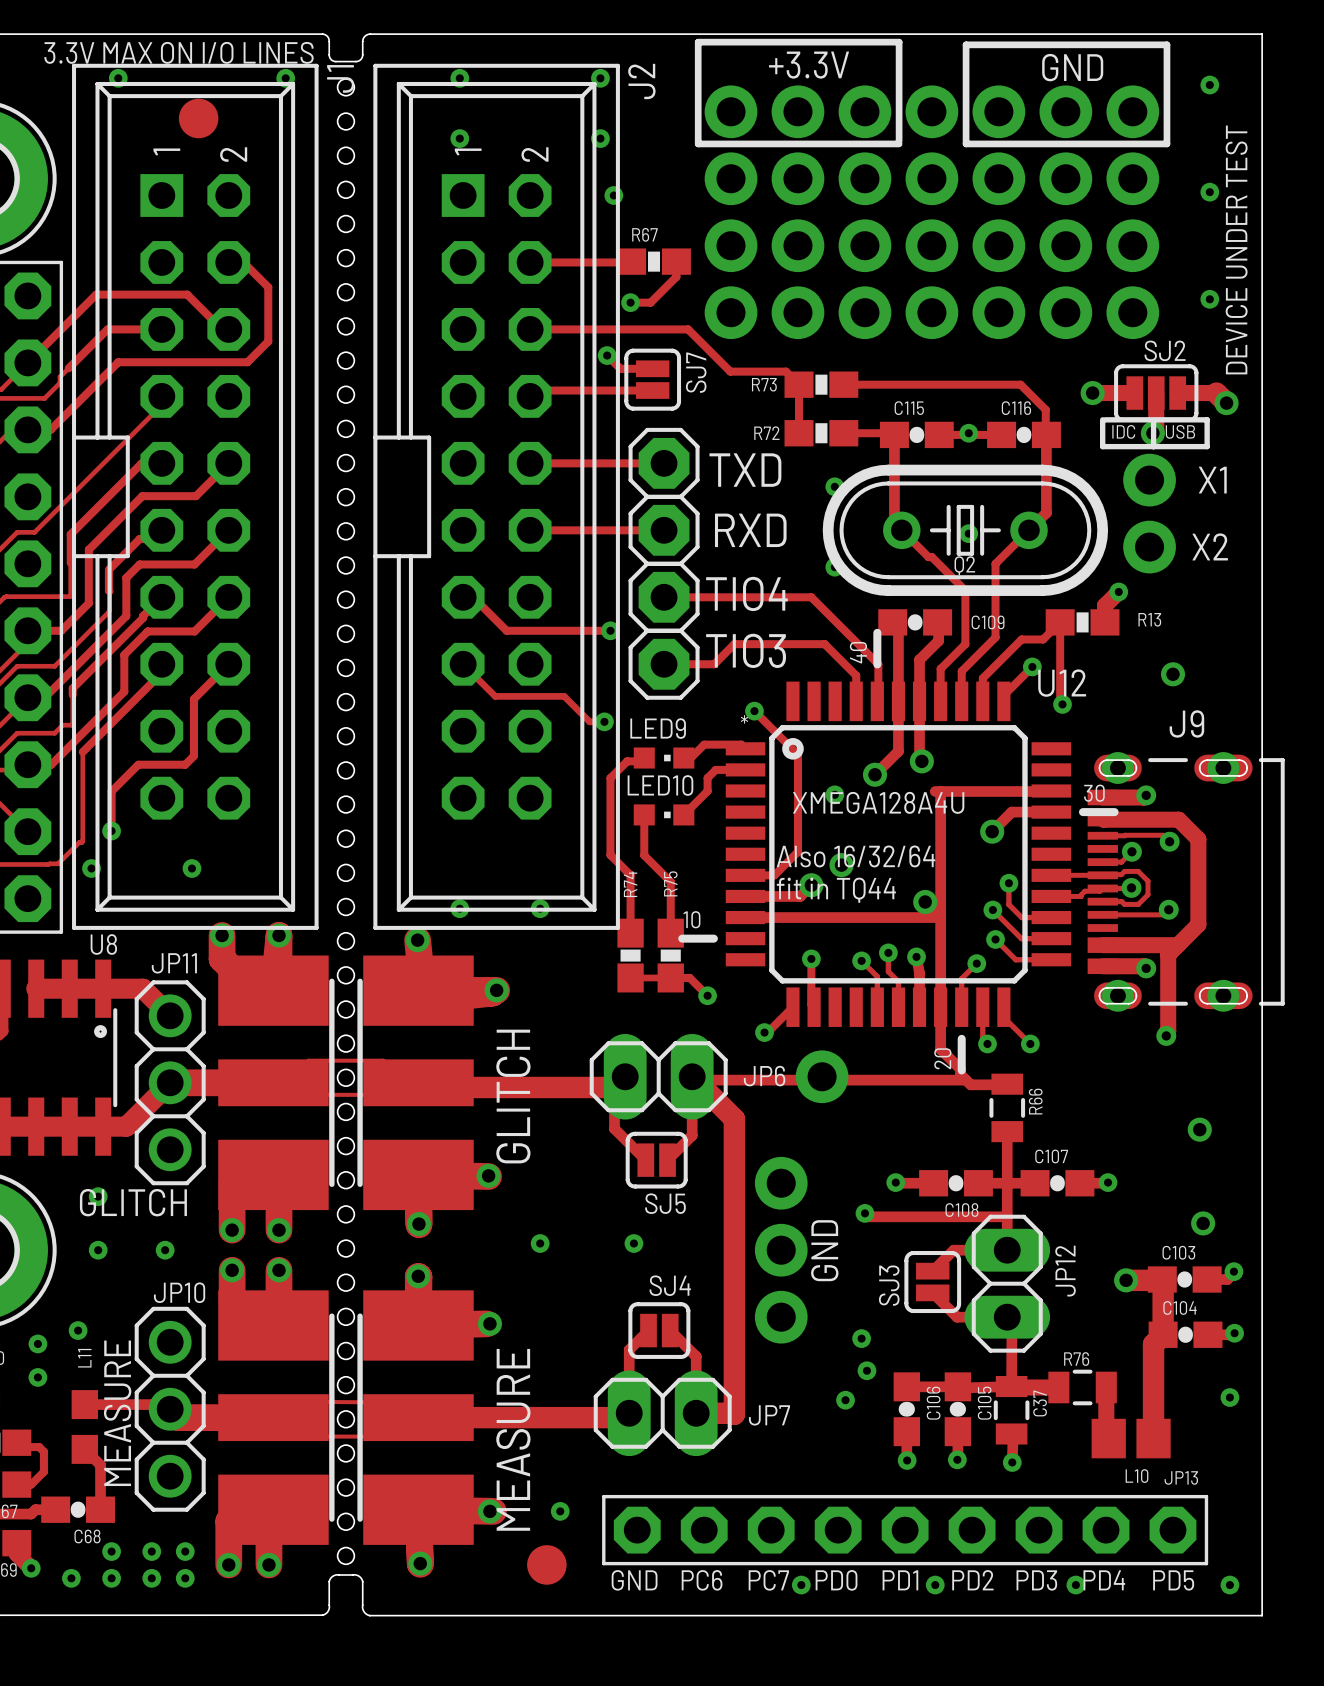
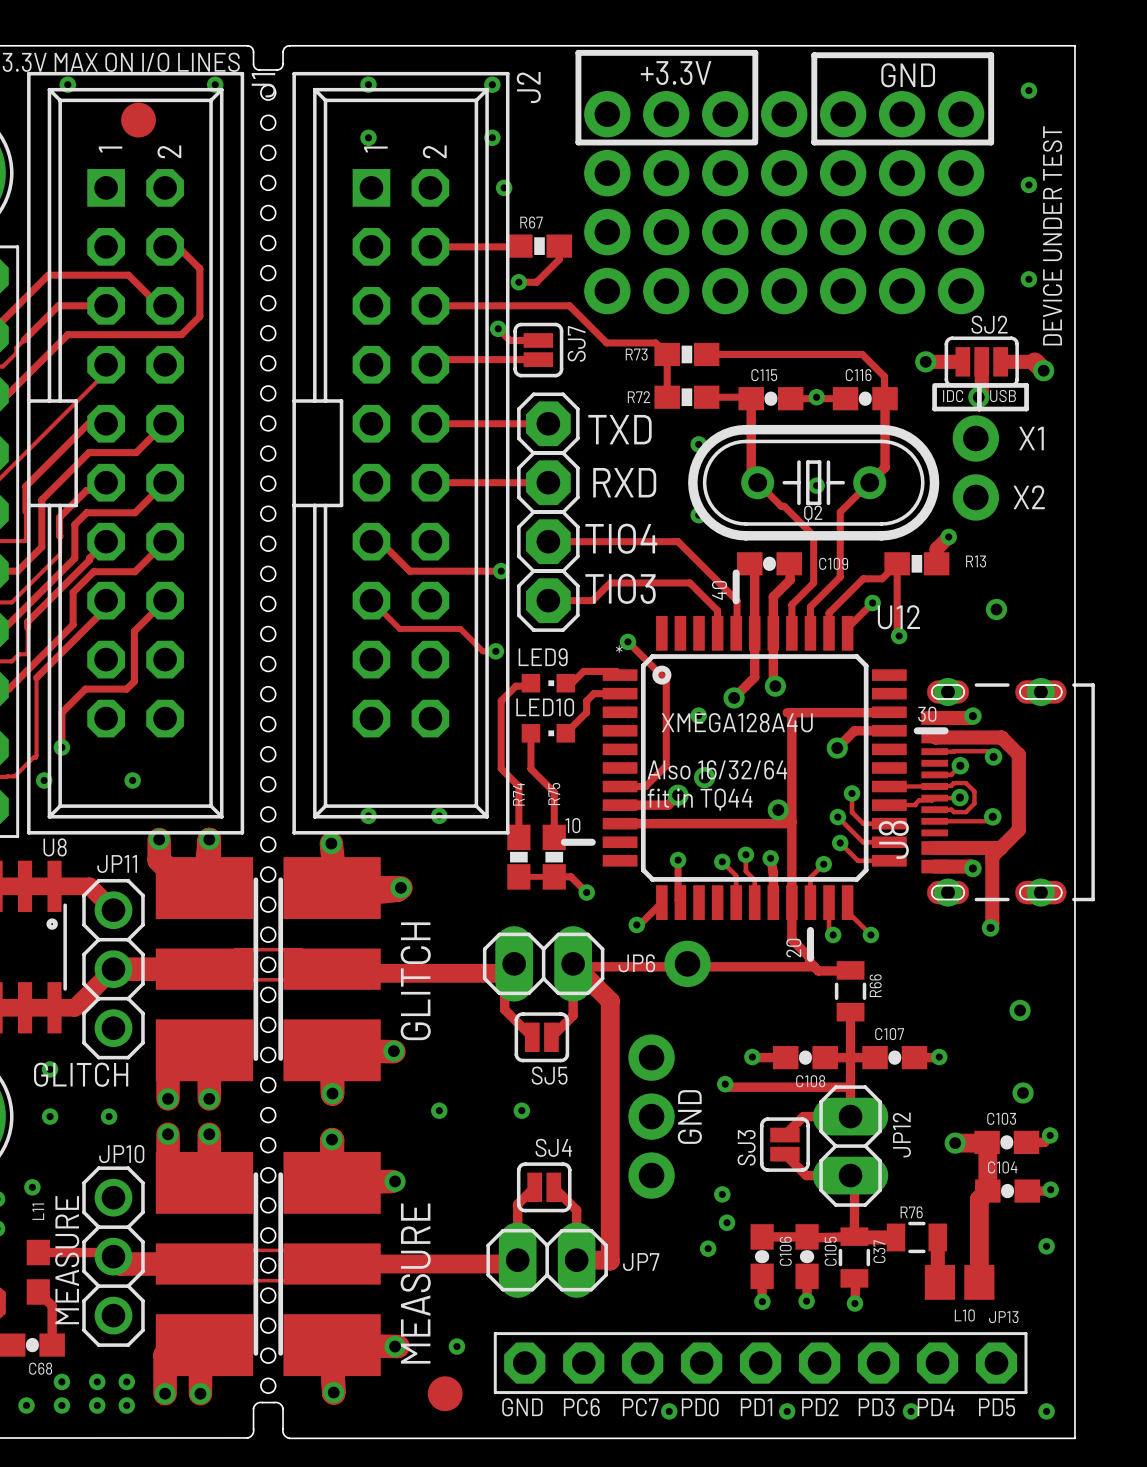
J9 name: J9 (1186, 723) -> J8 (893, 839)

